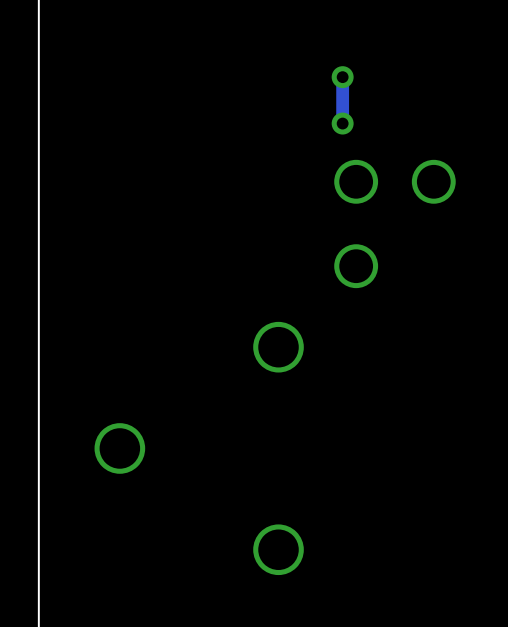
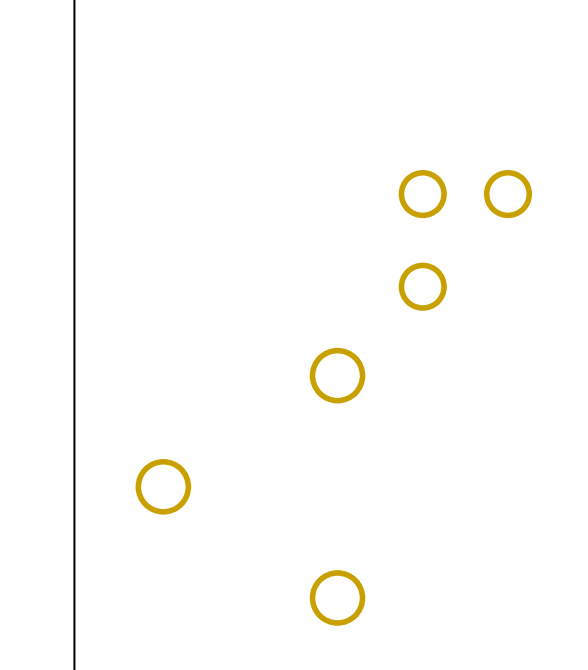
track: (342, 77) (342, 123) -> none
via: (342, 77) -> none
via: (342, 123) -> none

